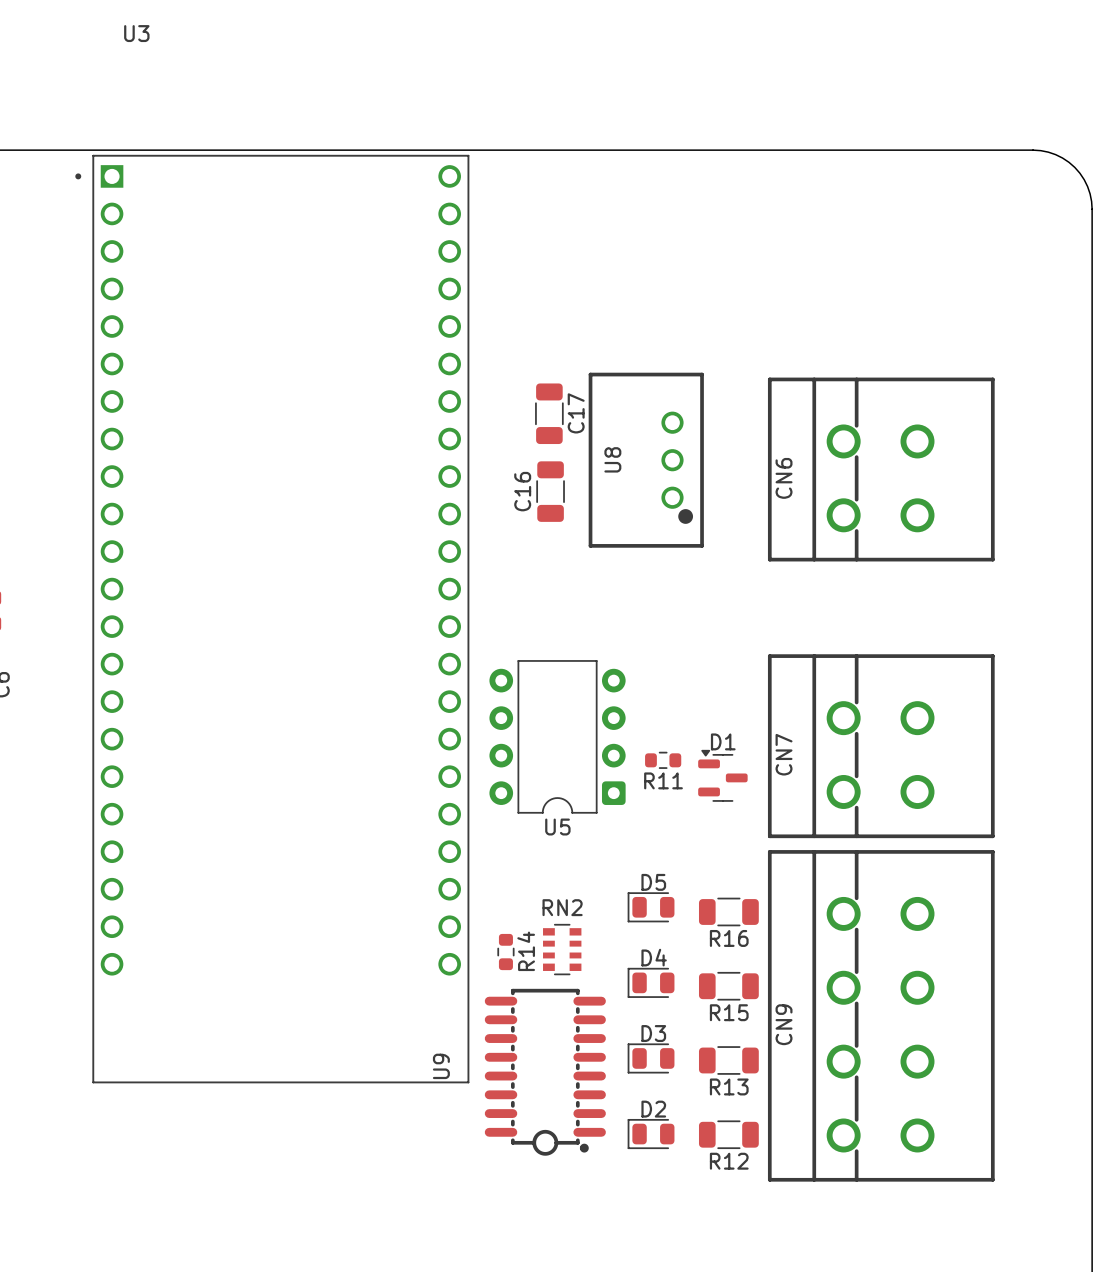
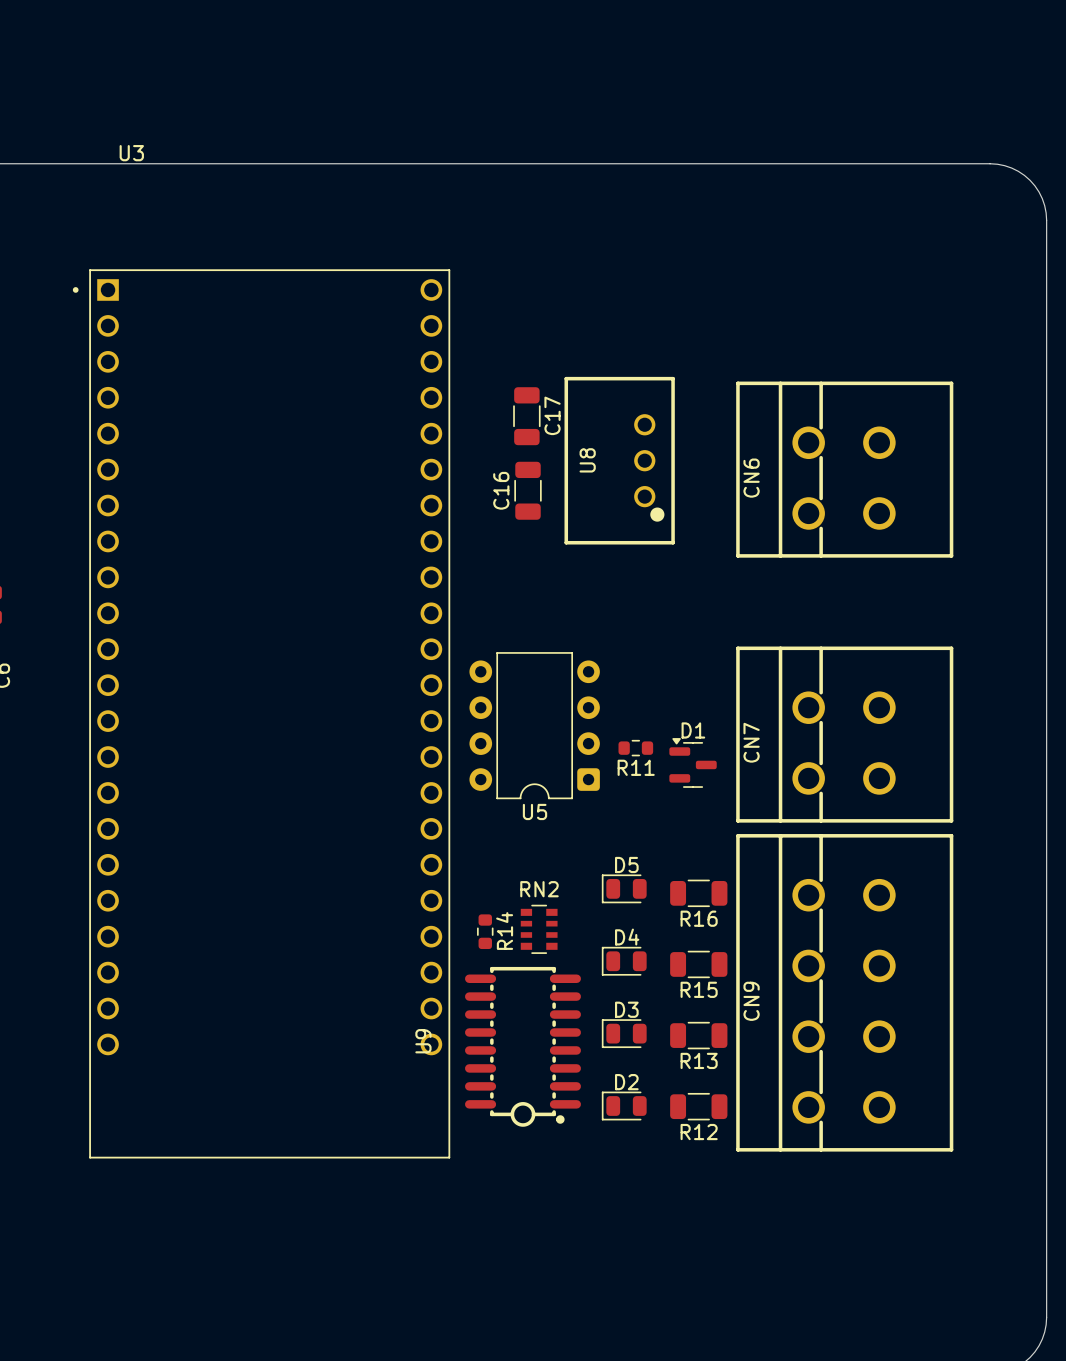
U3 position: (272, 619) -> (261, 713)

